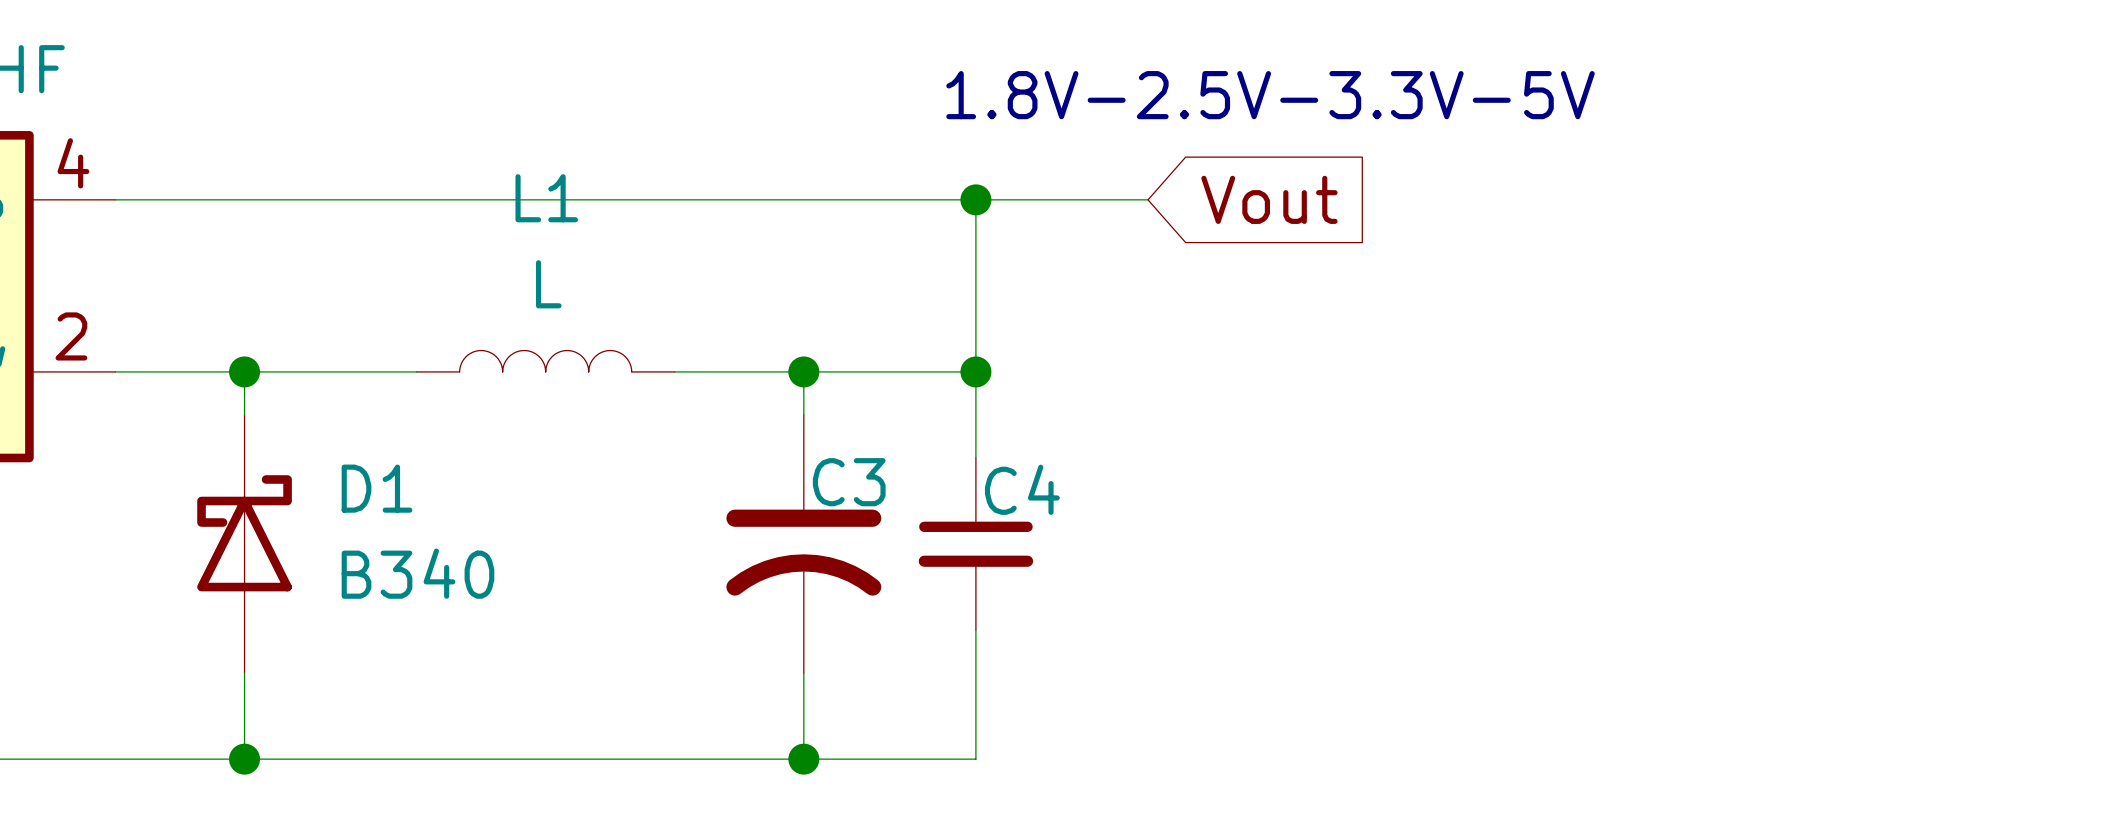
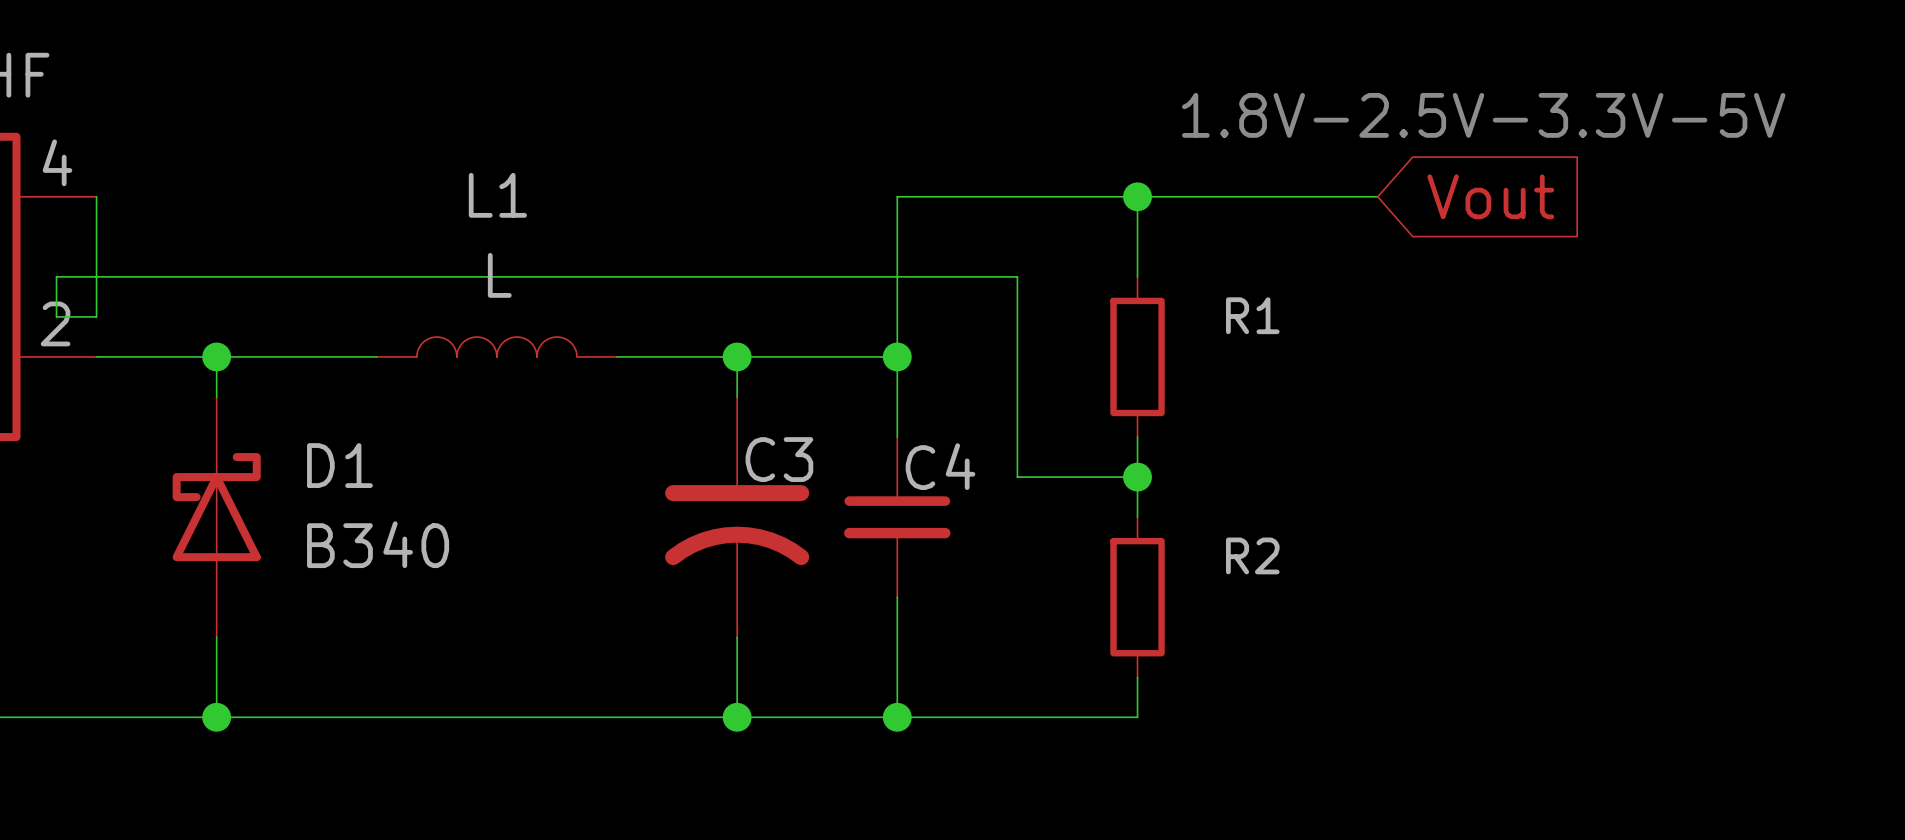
text position: 1.8V-2.5V-3.3V-5V (1270, 95) -> 1.8V-2.5V-3.3V-5V (1483, 115)
wire: (115, 199) (975, 199) -> (96, 196) (96, 316) (56, 316) (56, 276) (1017, 276) (1017, 477) (1137, 477)
junction: (975, 199) -> none
wire: none -> (1057, 196) (1377, 196)
wire: none -> (1137, 196) (1137, 276)
junction: none -> (1137, 196)
global label position: Vout (1269, 199) -> Vout (1490, 196)
R1: none -> (1137, 356)
wire: none -> (1137, 437) (1137, 517)
junction: none -> (1137, 477)
R2: none -> (1137, 597)
wire: none -> (1137, 677) (1137, 717) (897, 717)
junction: none -> (897, 717)

